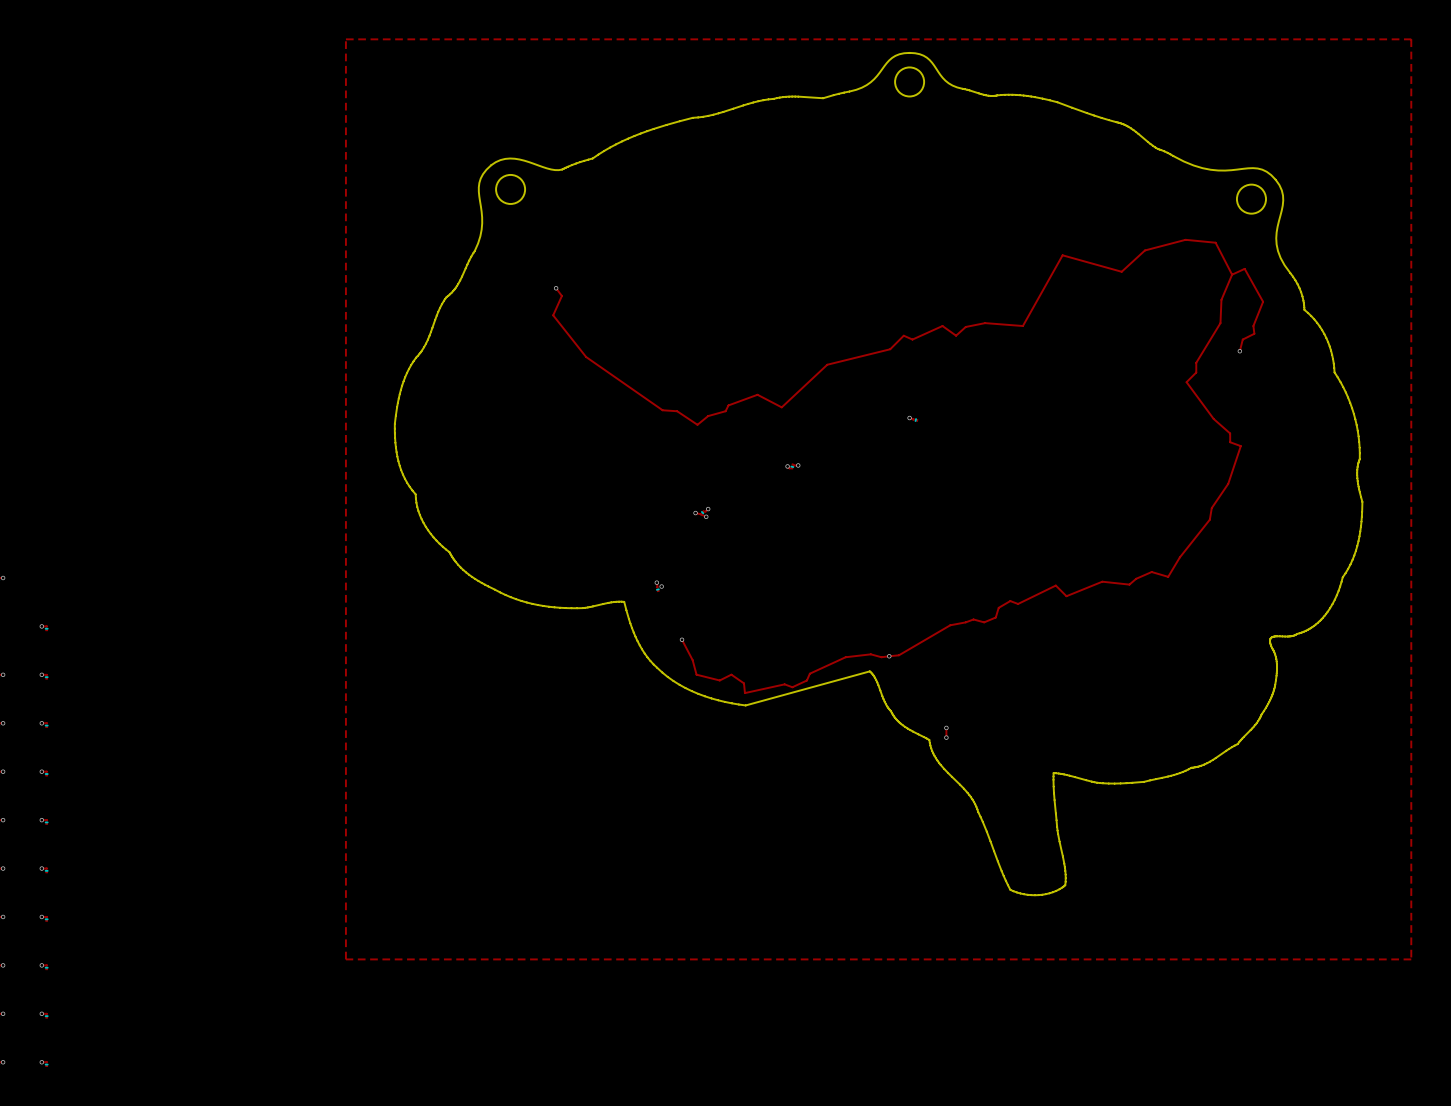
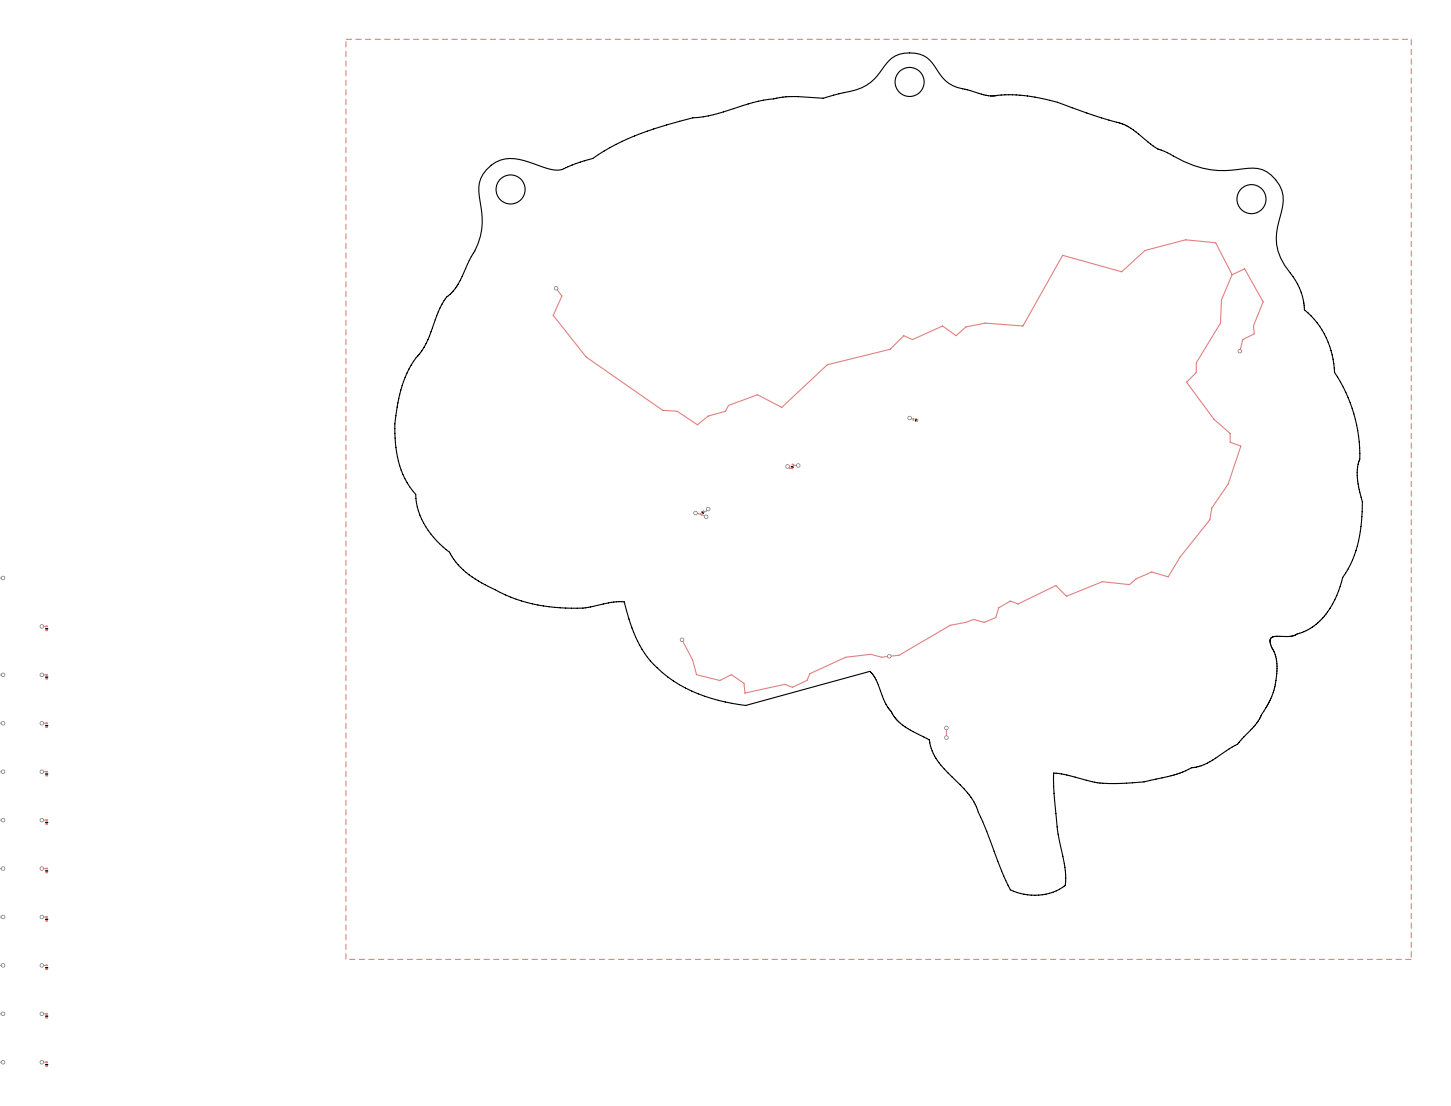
track: (656, 582) (657, 587) -> none
via: (656, 582) -> none
via: (661, 586) -> none
part: (657, 589) -> none

